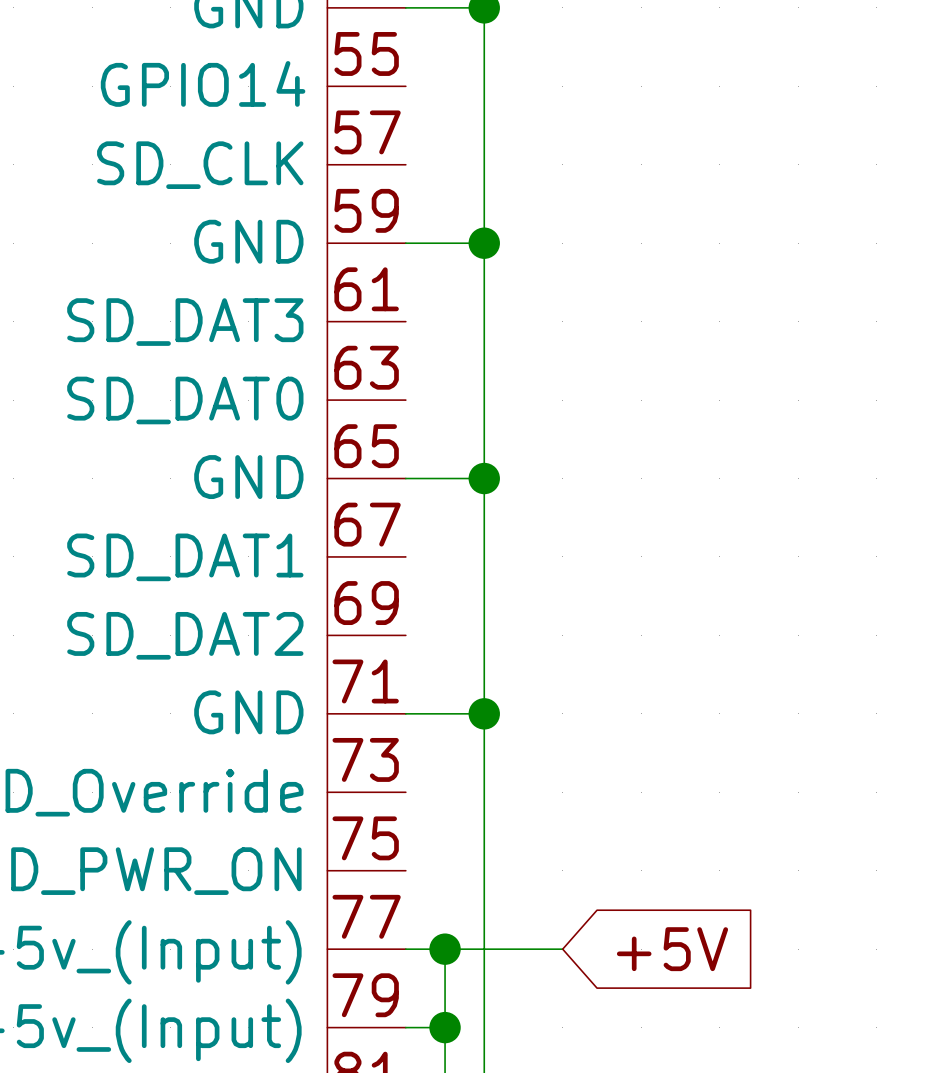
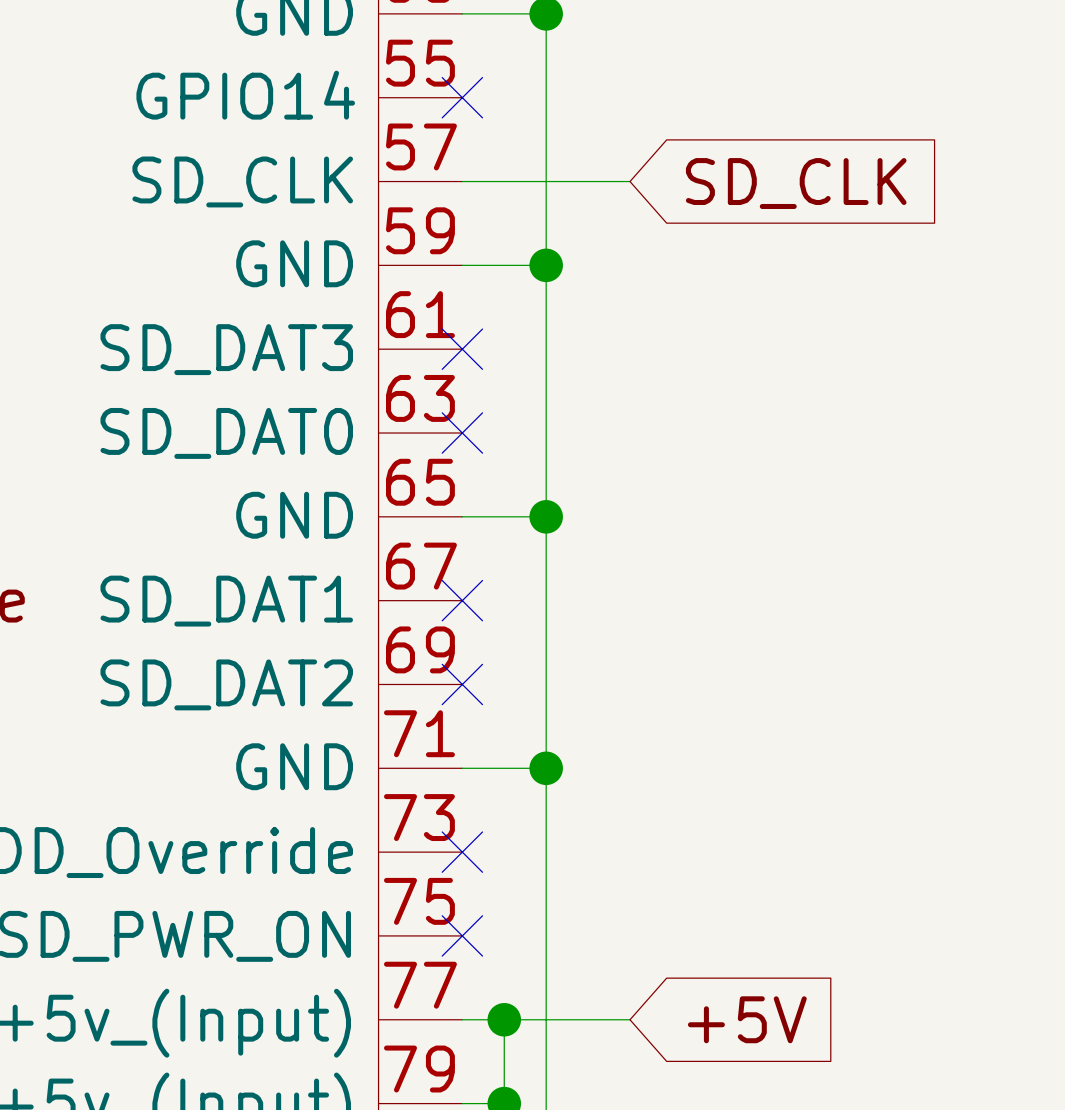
no-connect mark: none -> (462, 97)
wire: none -> (462, 181) (630, 181)
global label: none -> SD_CLK (796, 183)
no-connect mark: none -> (462, 349)
no-connect mark: none -> (462, 433)
no-connect mark: none -> (462, 600)
no-connect mark: none -> (462, 684)
no-connect mark: none -> (462, 852)
no-connect mark: none -> (462, 935)

